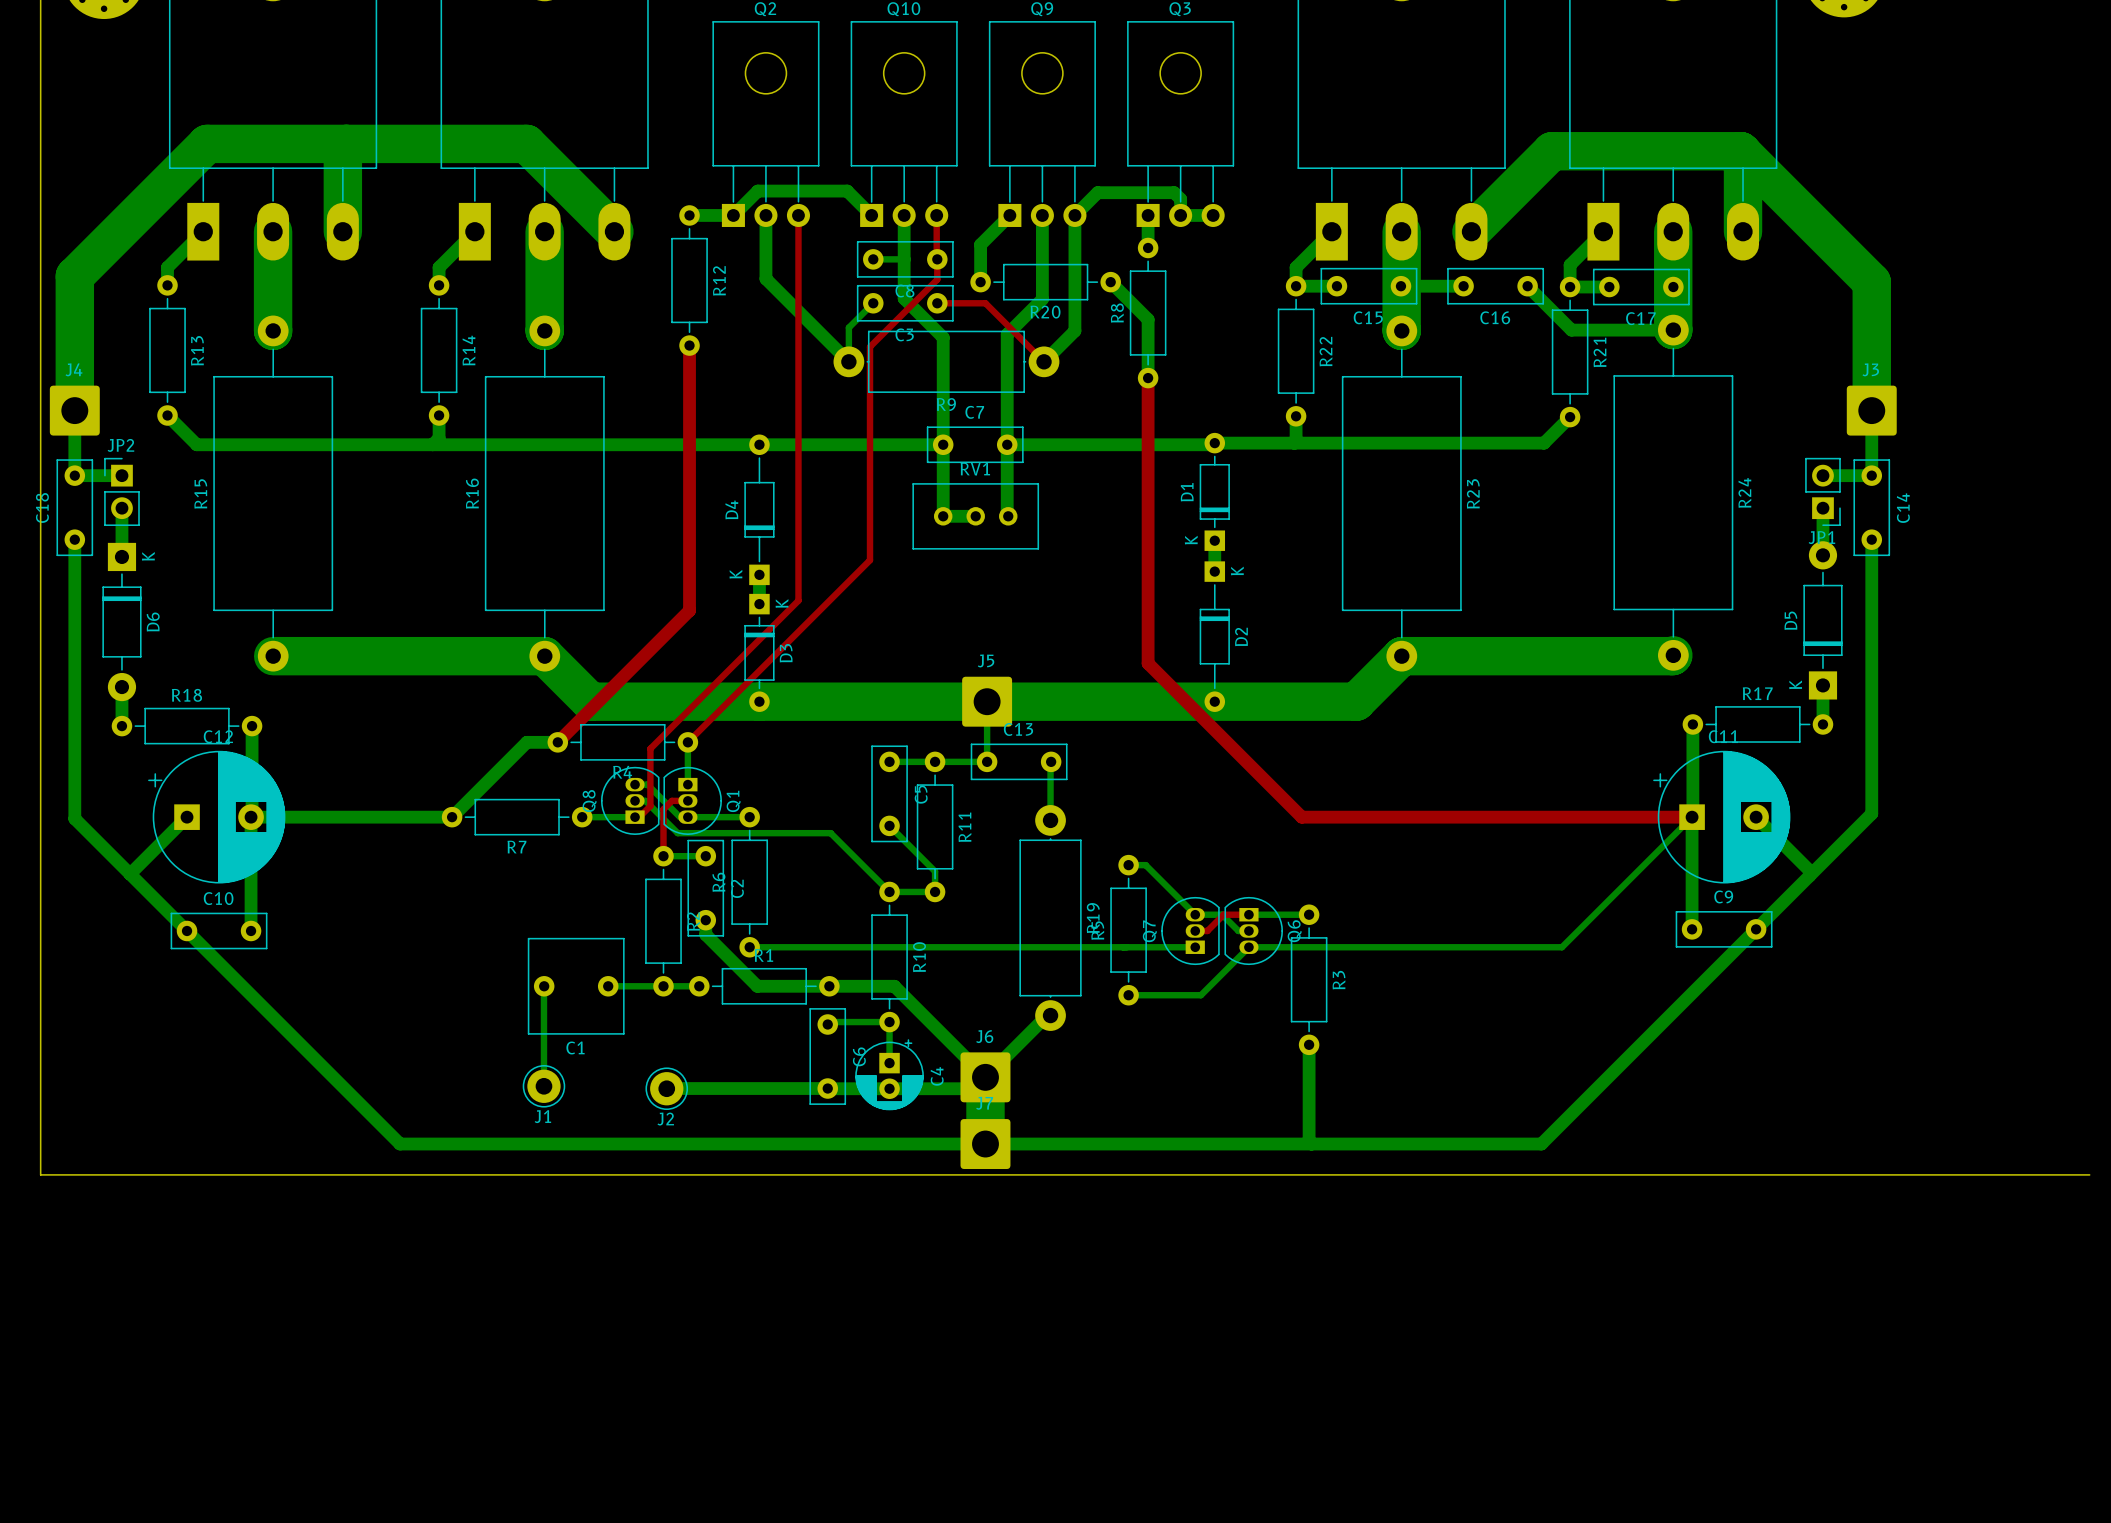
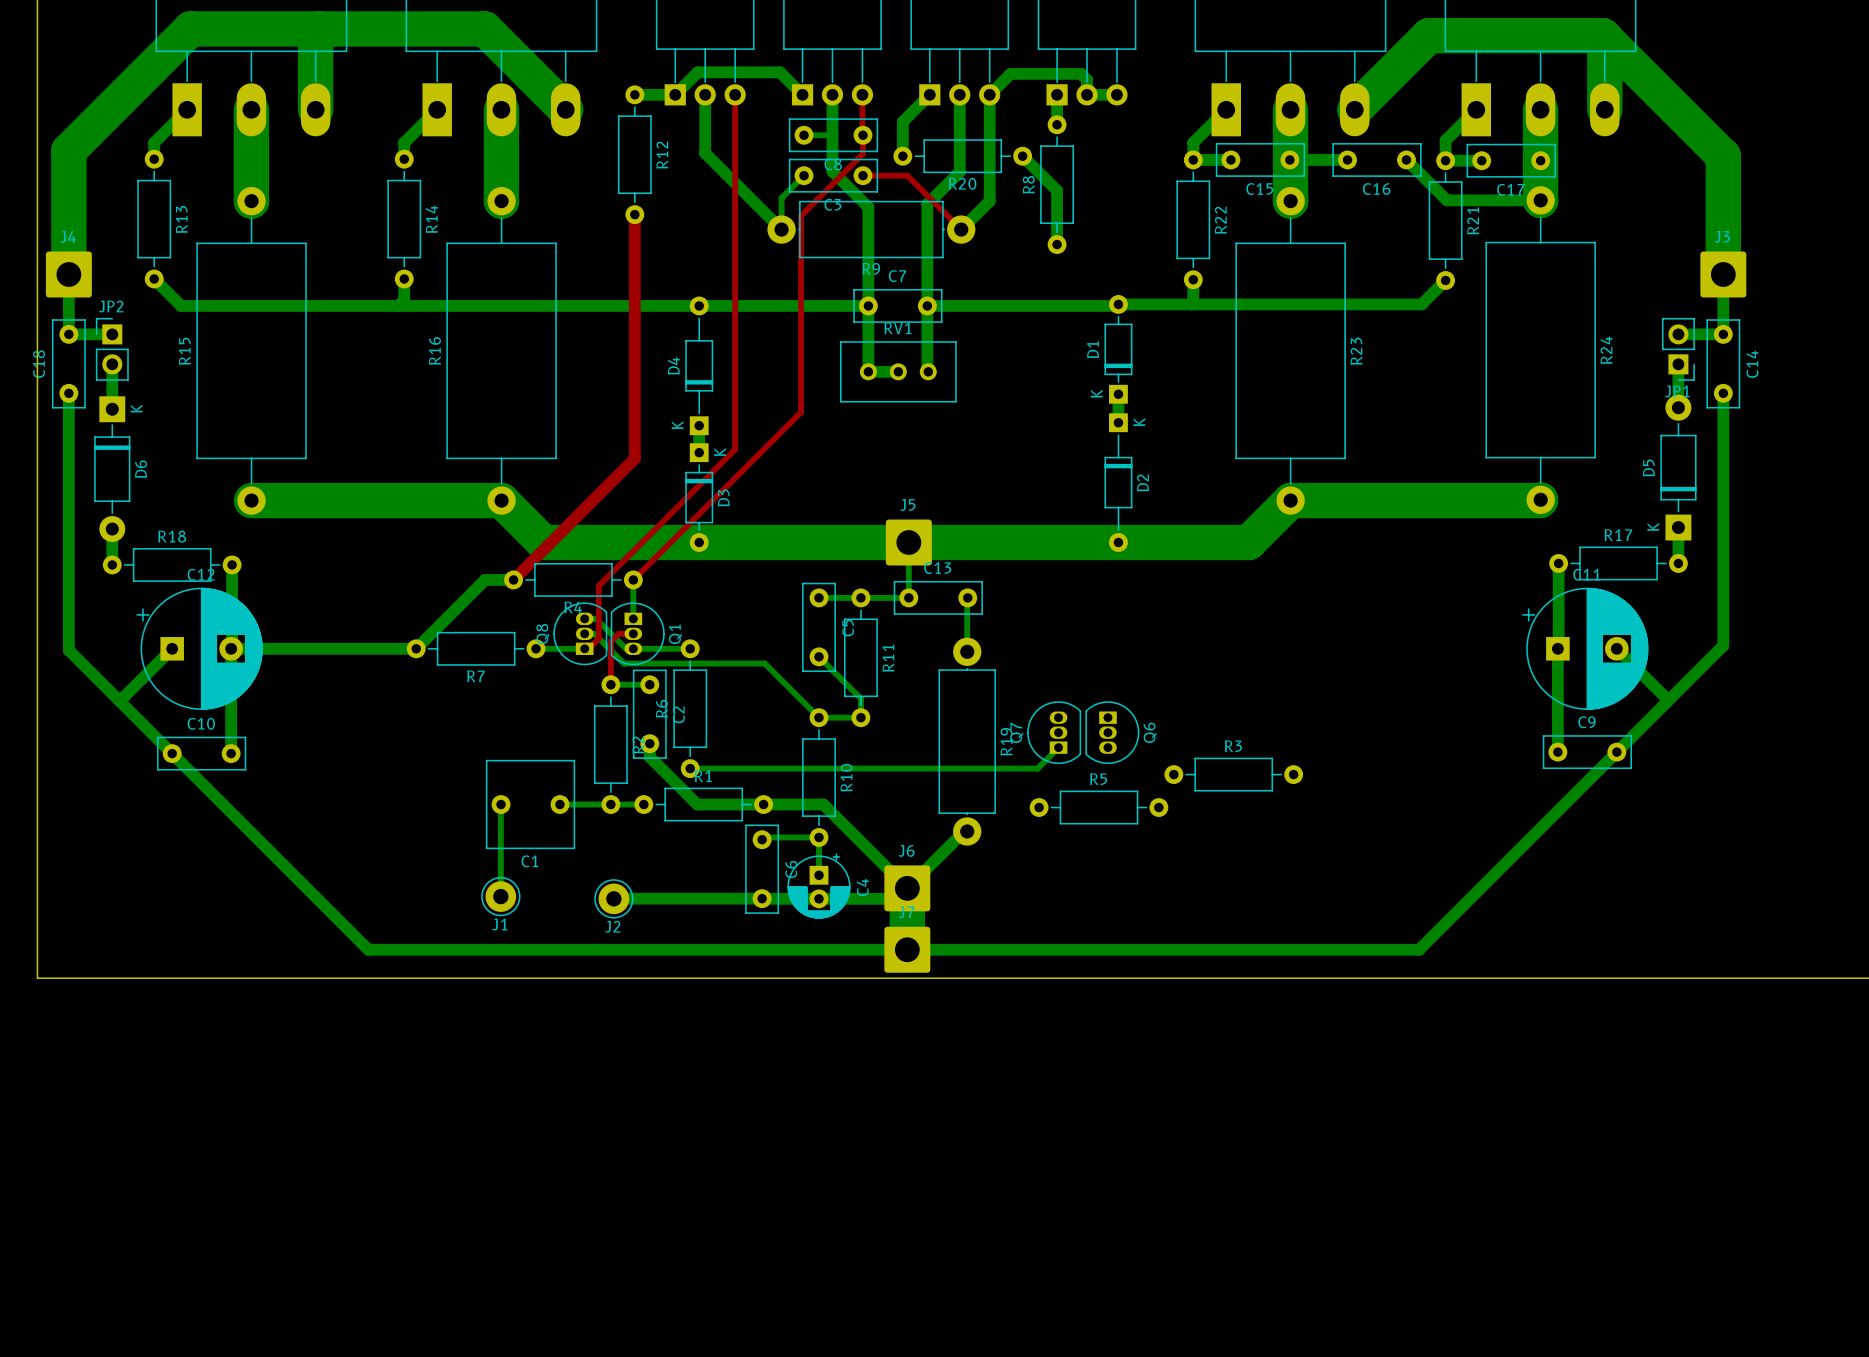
top track: (1148, 378) (1148, 663) (1301, 817) (1692, 817) -> none
bottom track: (1692, 817) (1561, 947) (1248, 947) (1200, 995) (1128, 995) -> none
bottom track: (1128, 865) (1145, 865) (1195, 914) (1222, 914) (1238, 930) (1248, 930) -> none
bottom track: (1248, 914) (1309, 914) -> none
top track: (1248, 914) (1223, 914) (1207, 930) (1195, 930) -> none
R5 rotation: 0° (1128, 930) -> 90° clockwise (1098, 807)
Q7 position: (1190, 930) -> (1054, 732)
Q6 position: (1253, 930) -> (1112, 732)
bottom track: (1126, 947) (1195, 947) -> (1037, 768) (1058, 747)
R3 rotation: 0° (1309, 979) -> 90° clockwise (1233, 774)
R3 name position: R3 (1339, 980) -> R3 (1233, 746)
bottom track: (1309, 1044) (1309, 1141) (1311, 1144) -> none

